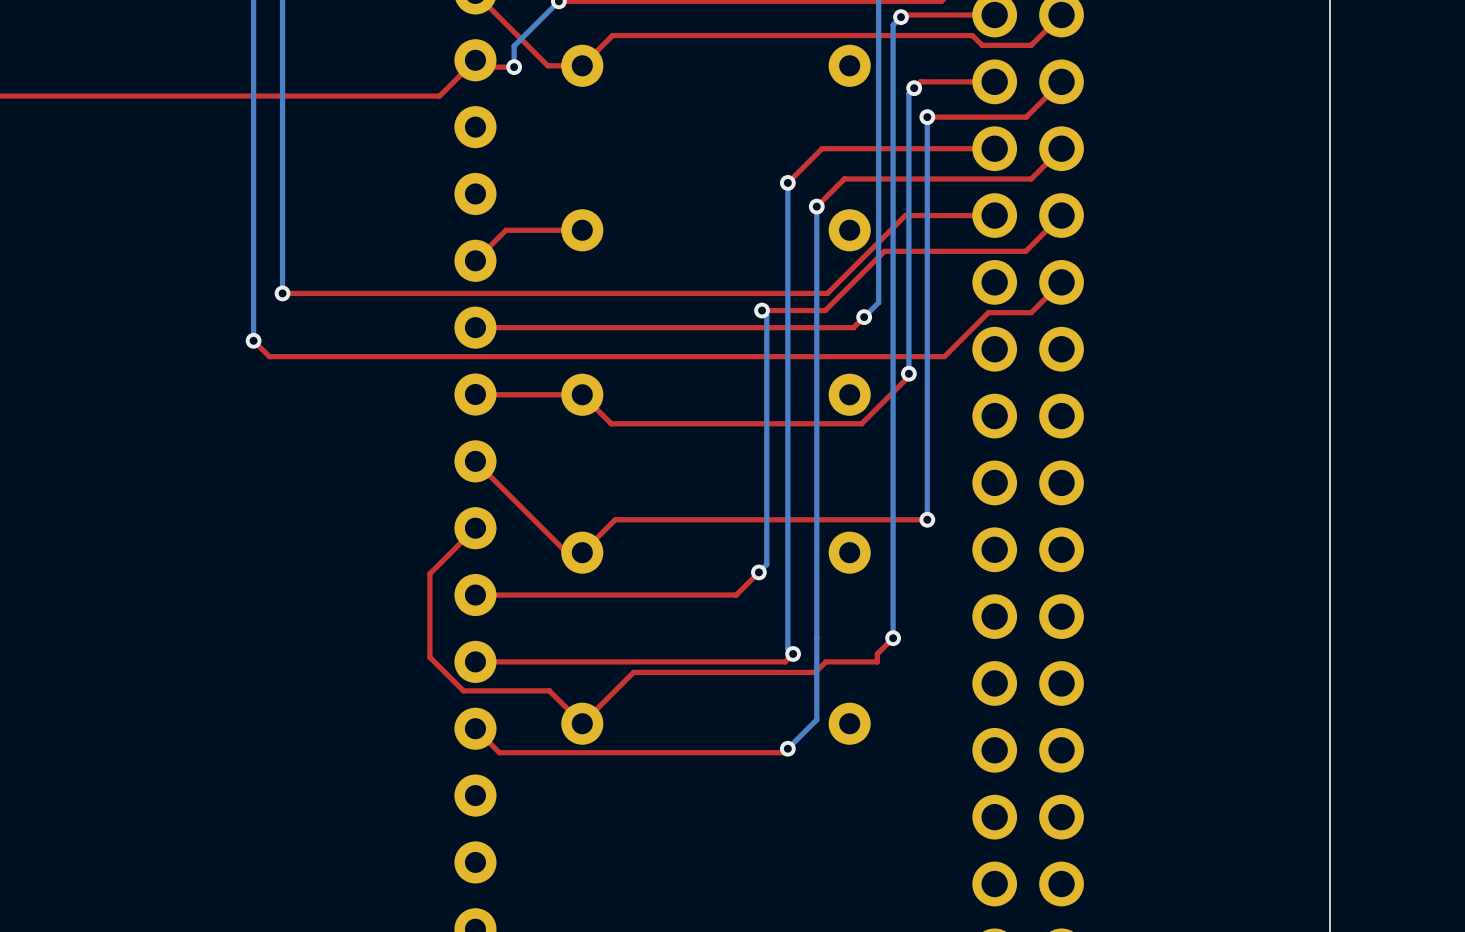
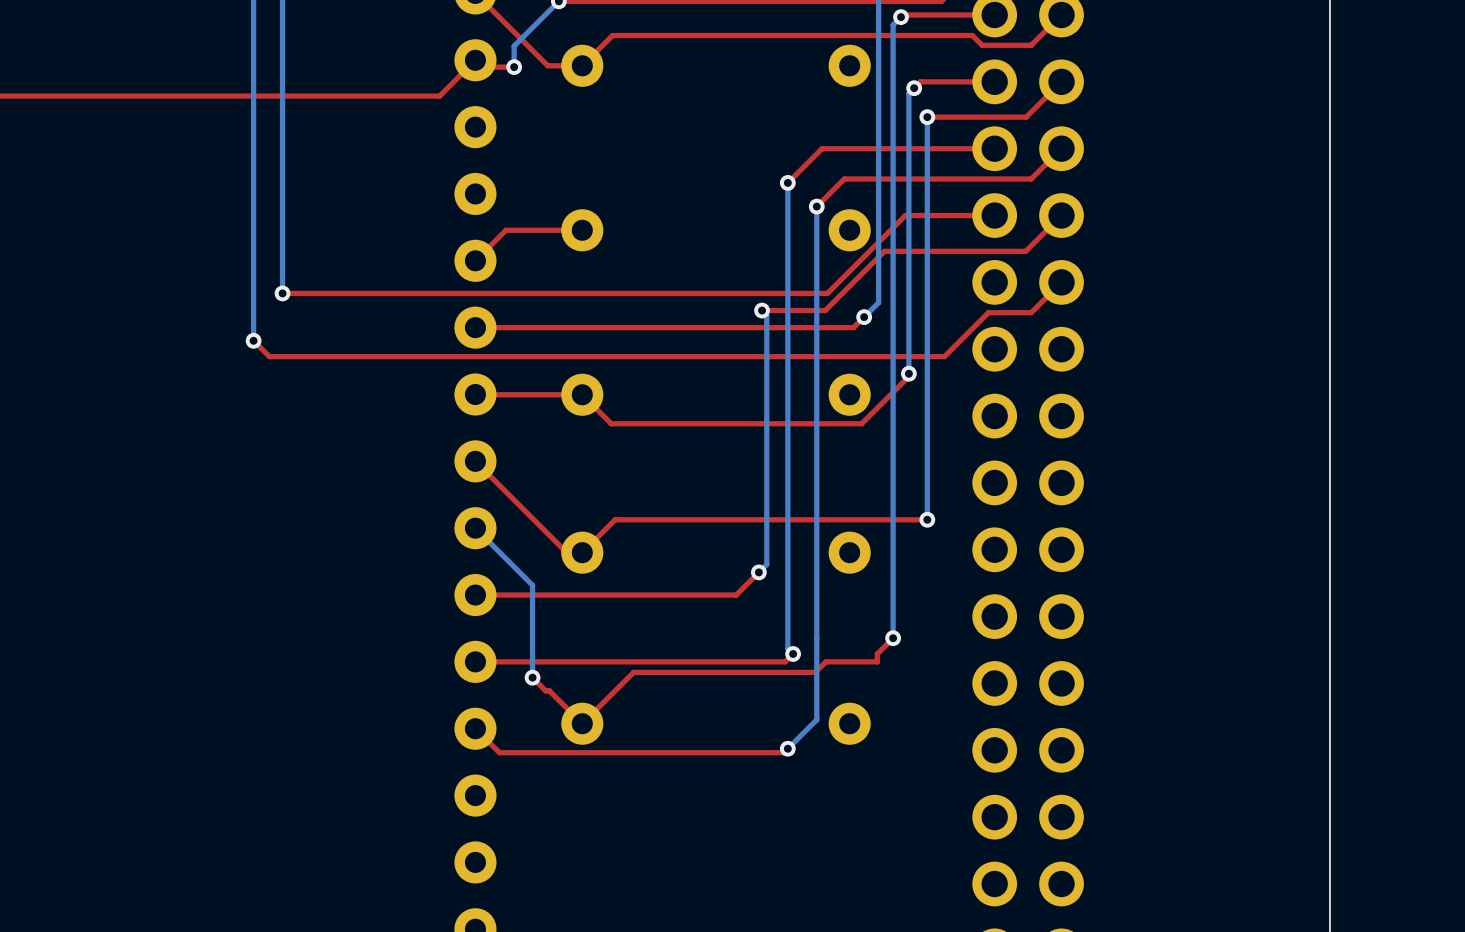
top track: (475, 528) (429, 573) (429, 657) (463, 690) (545, 690) -> (532, 677) (545, 690)
bottom track: none -> (475, 528) (532, 585) (532, 677)
via: none -> (532, 677)

